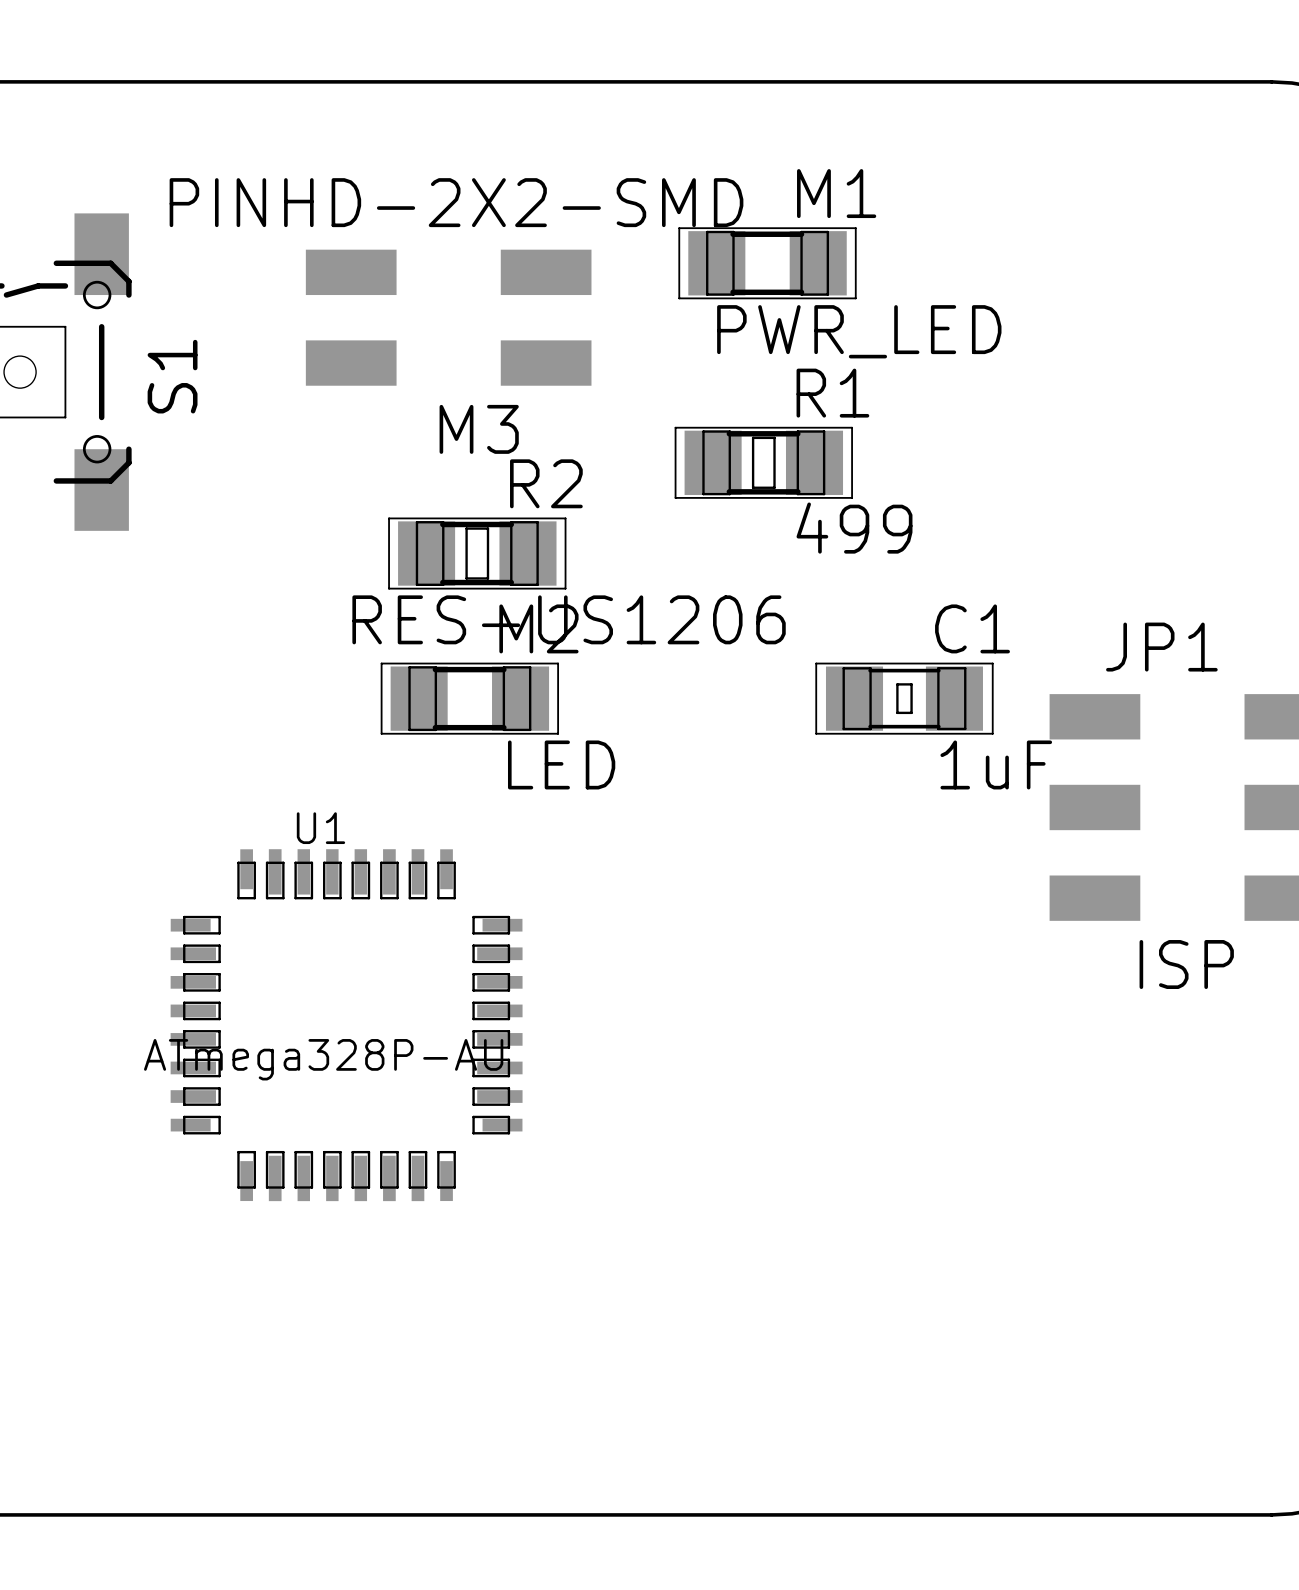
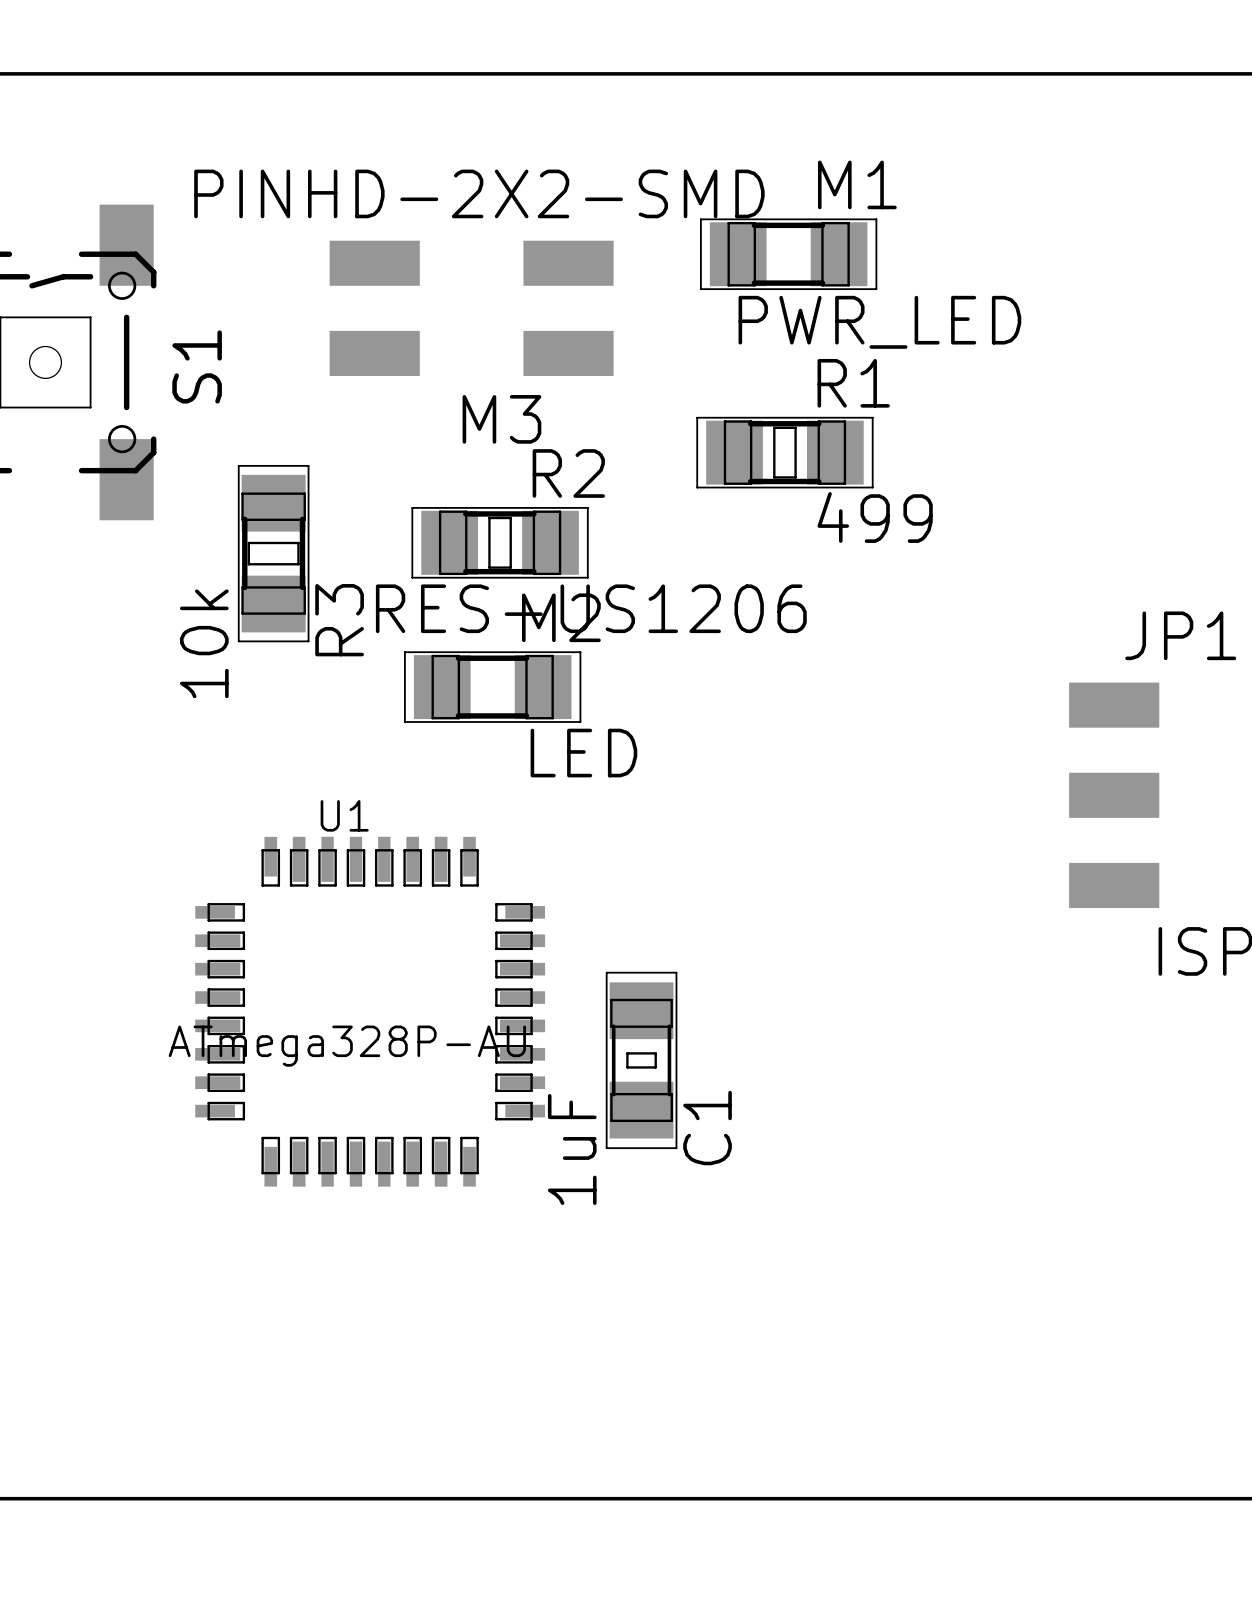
R3: none -> 10k (273, 553)
C1 rotation: 0° (904, 698) -> 90° clockwise (641, 1060)
C1 position: (904, 698) -> (641, 1060)

